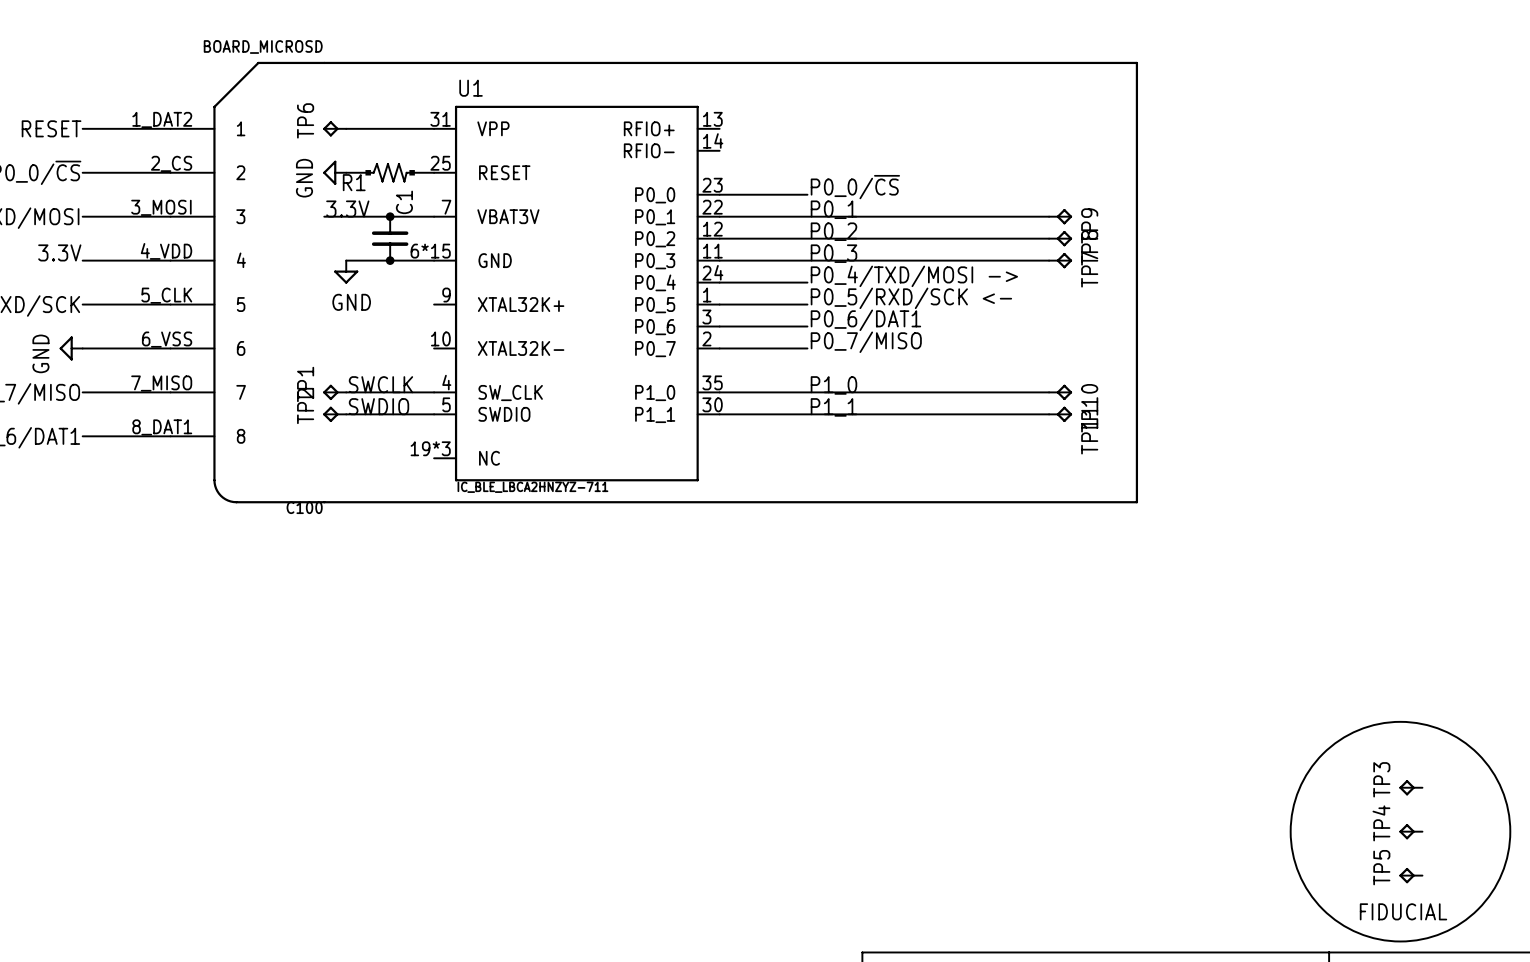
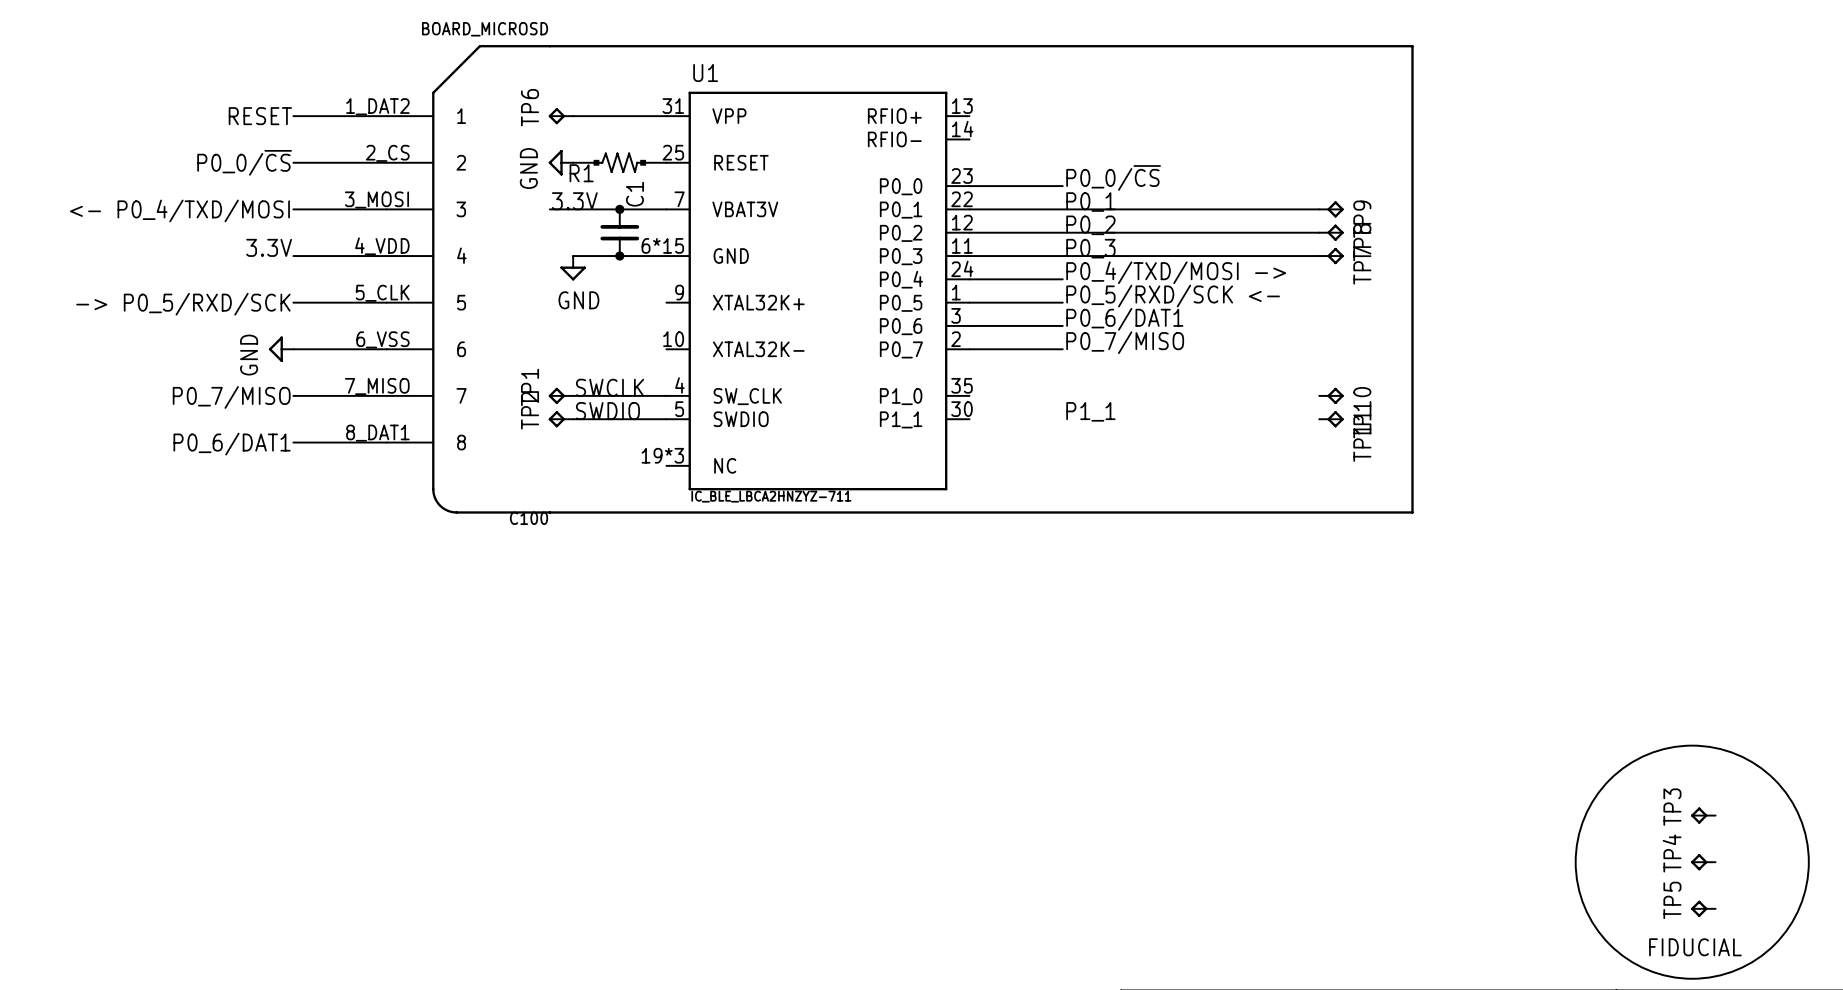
label: P1_0 (833, 385) -> none
wire: (719, 392) (1049, 392) -> none
wire: (719, 414) (1049, 414) -> none

